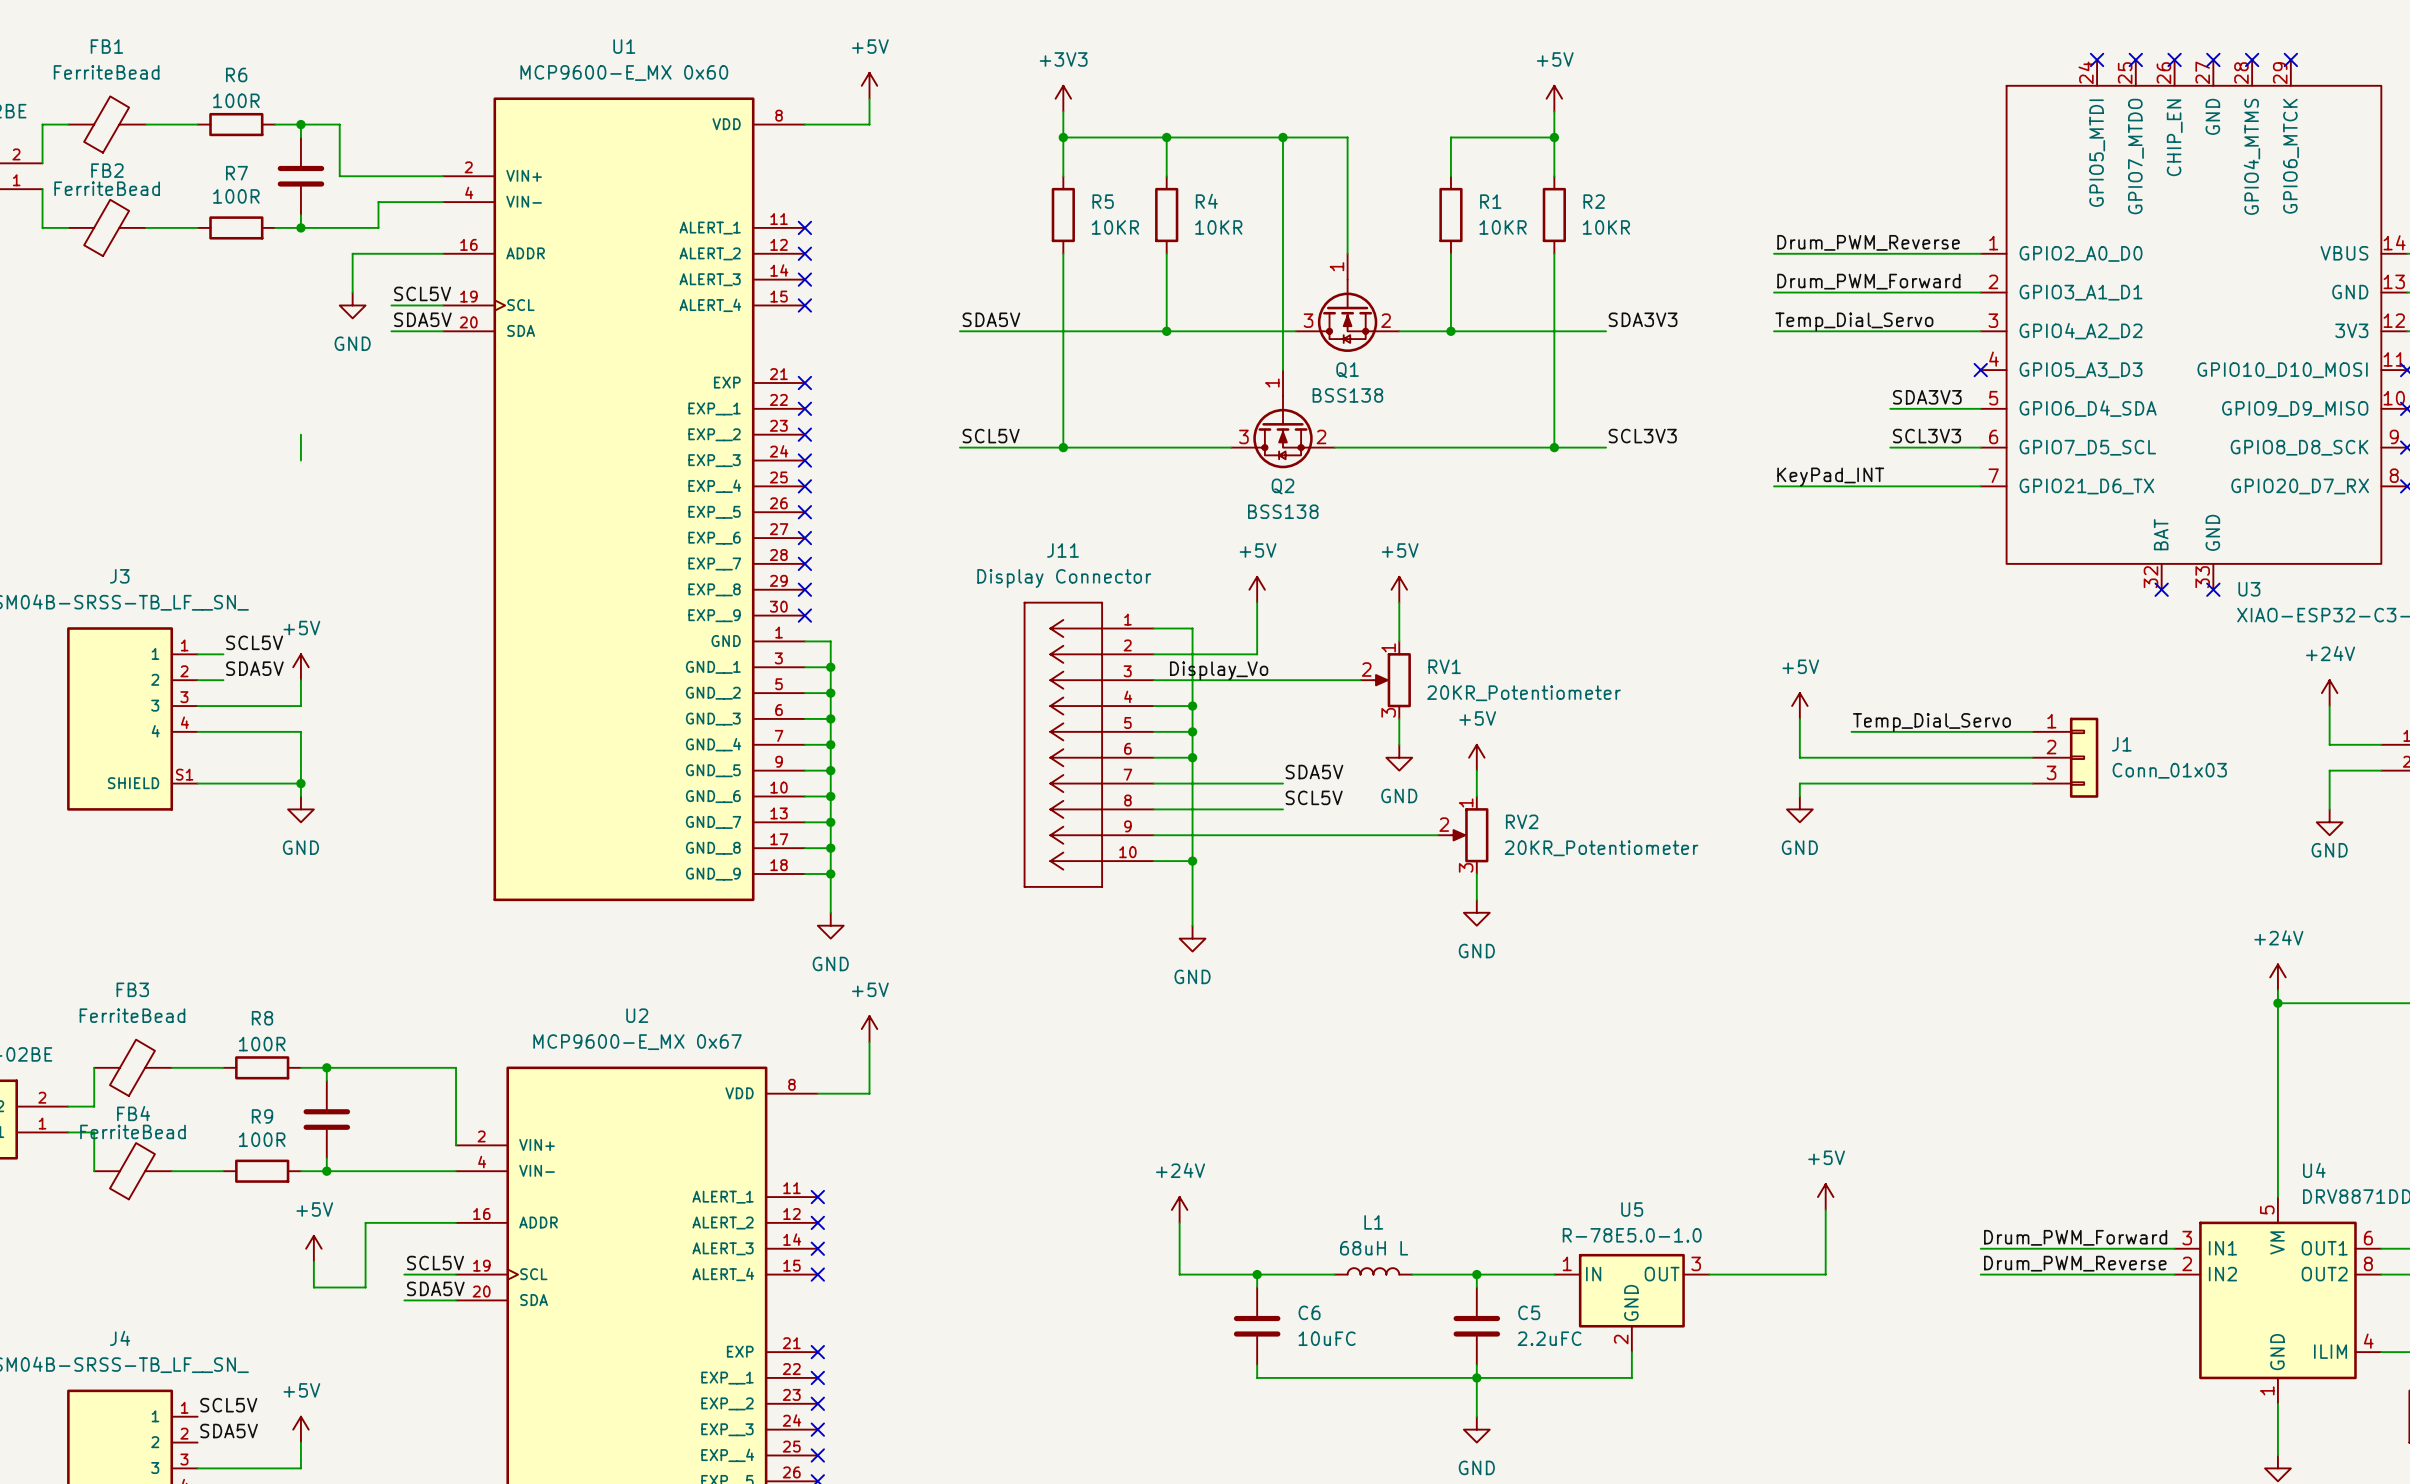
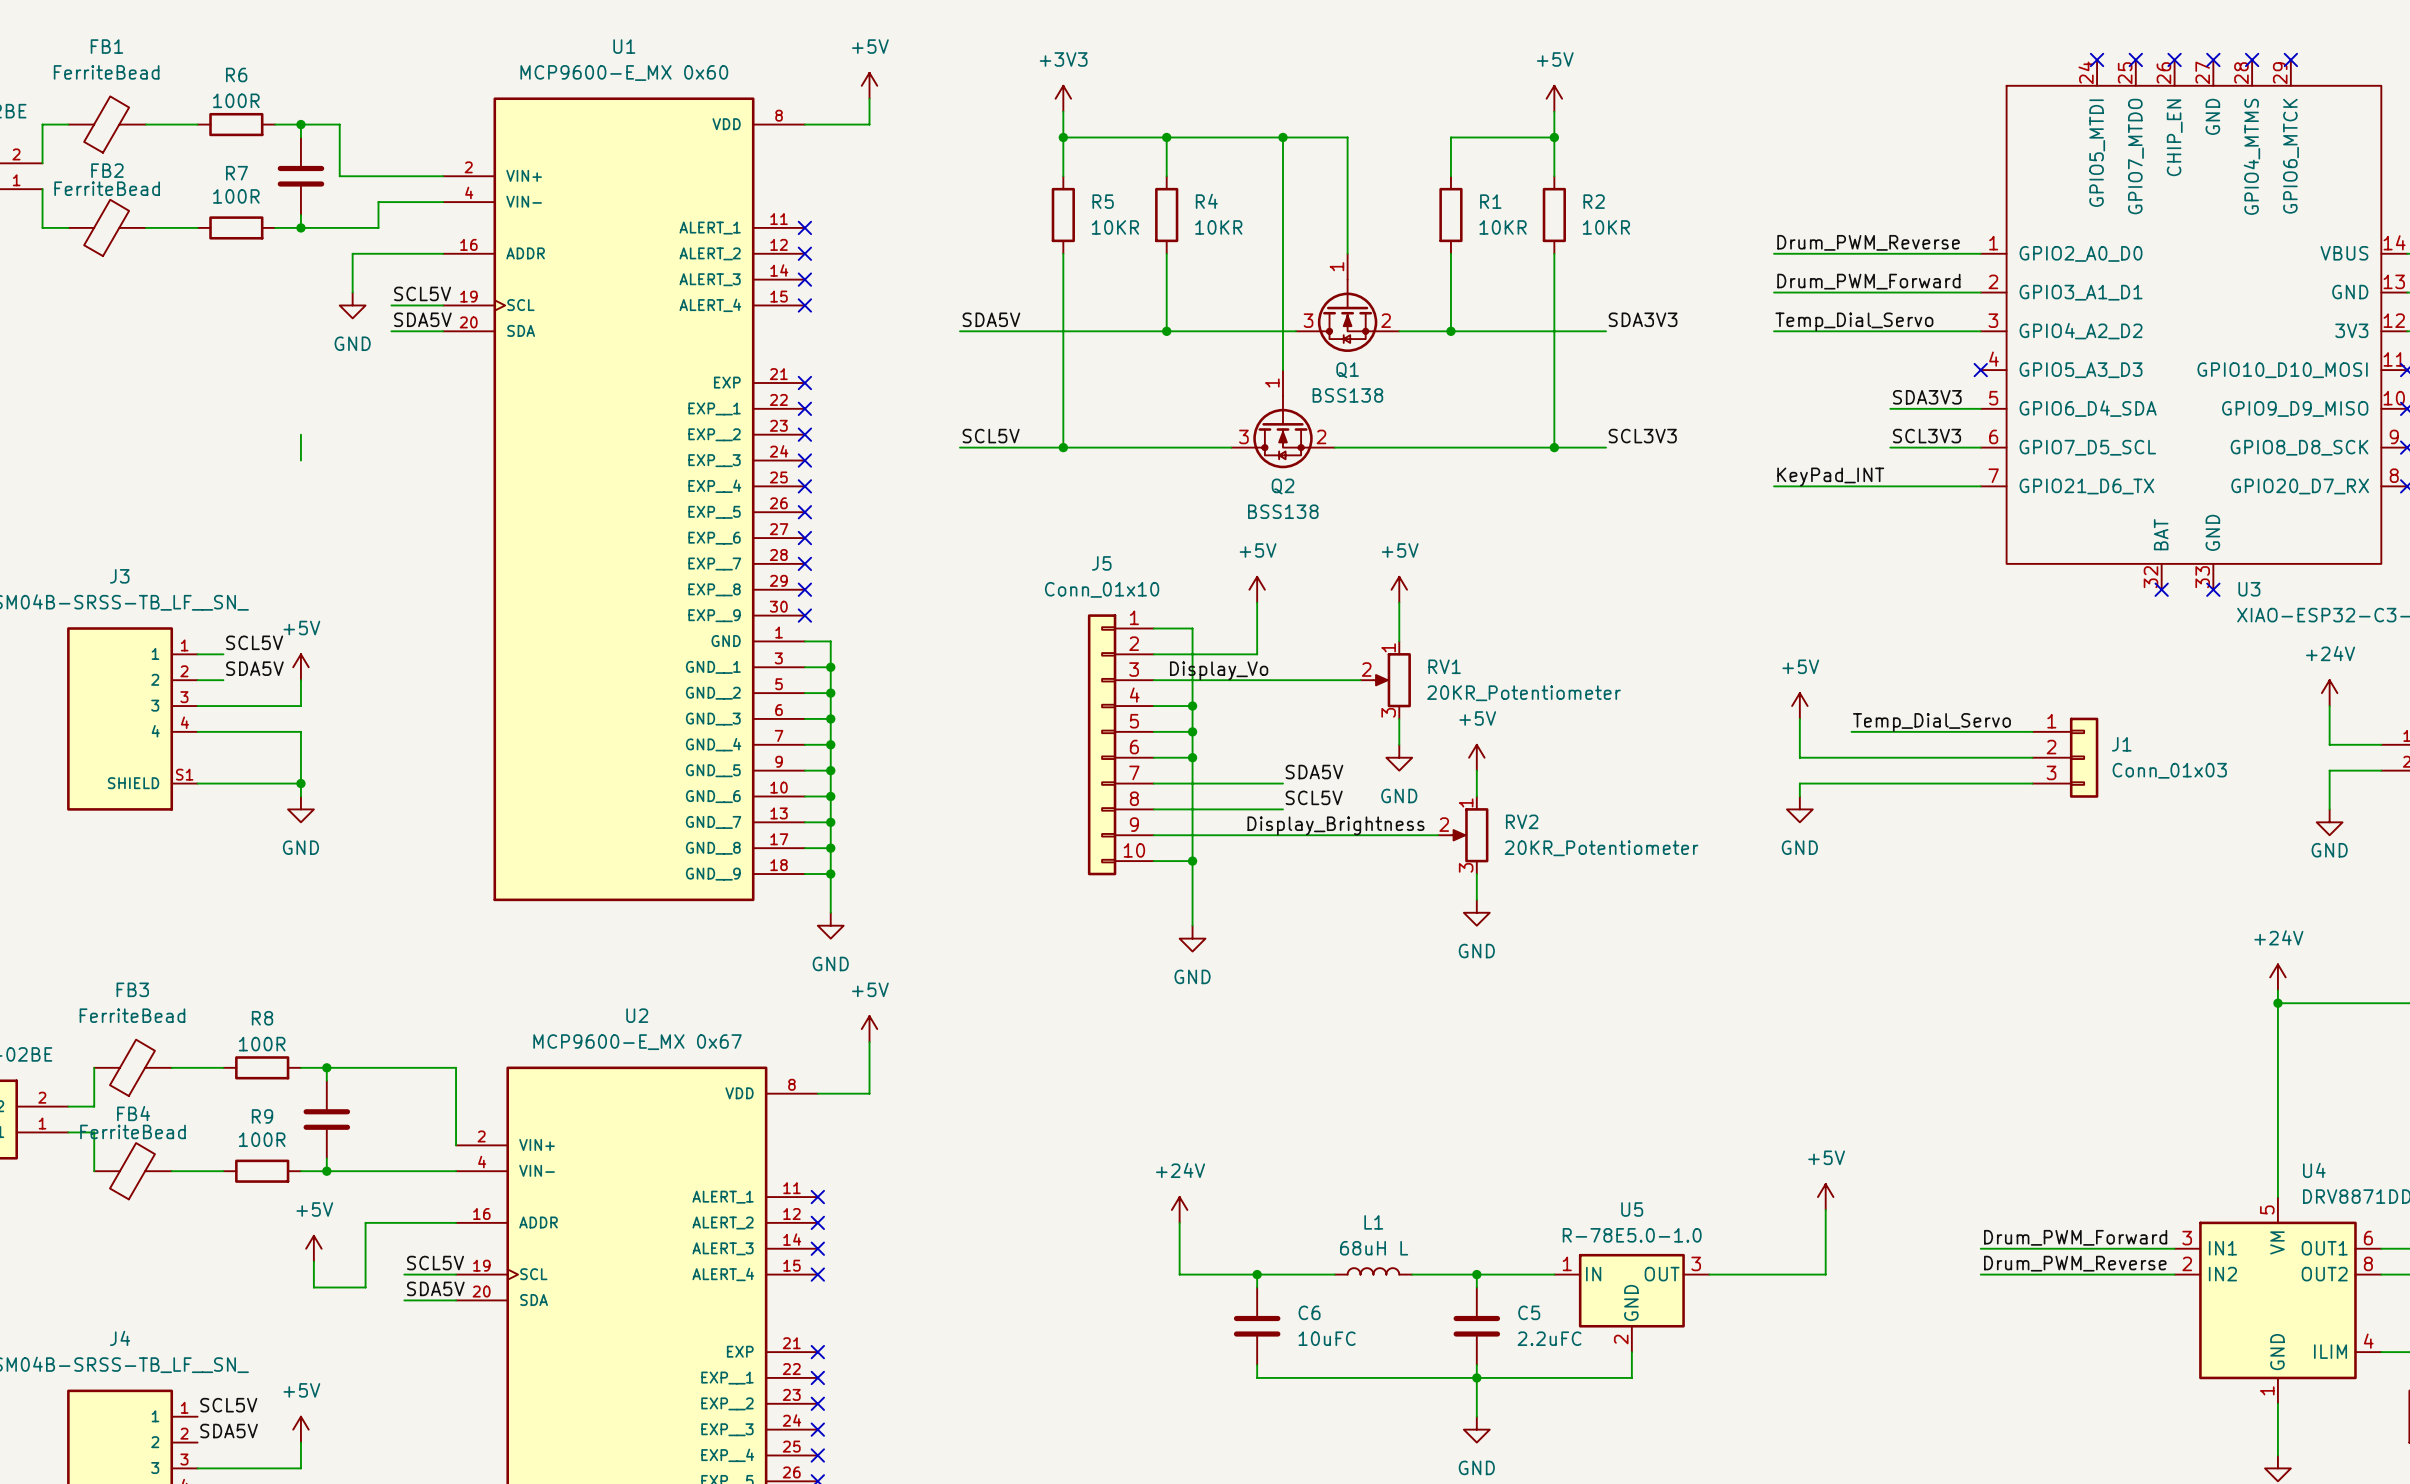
J11: Display Connector (1088, 744) -> none
J5: none -> Conn_01x10 (1120, 744)
label: none -> Display_Brightness (1336, 825)

